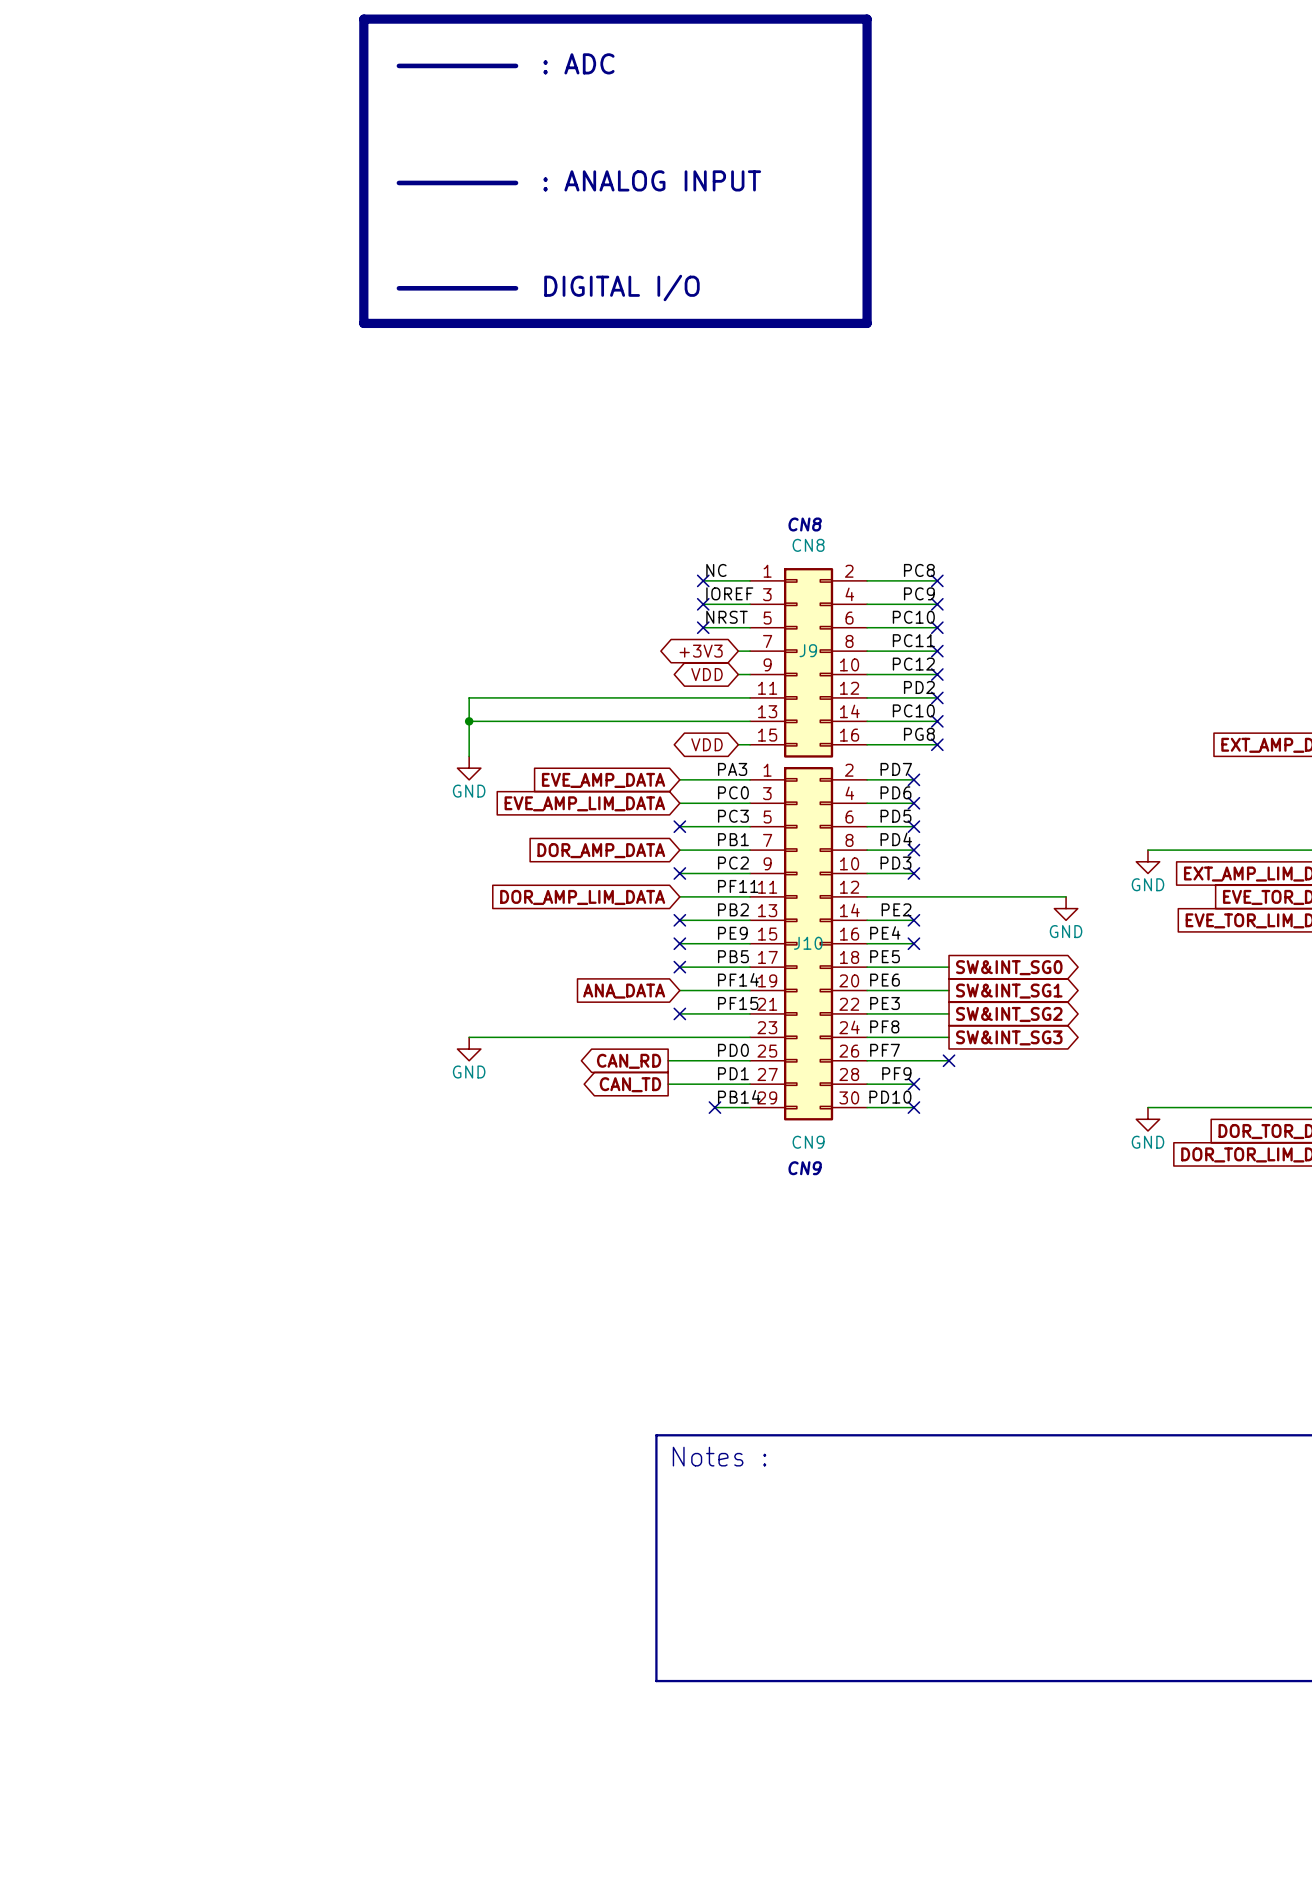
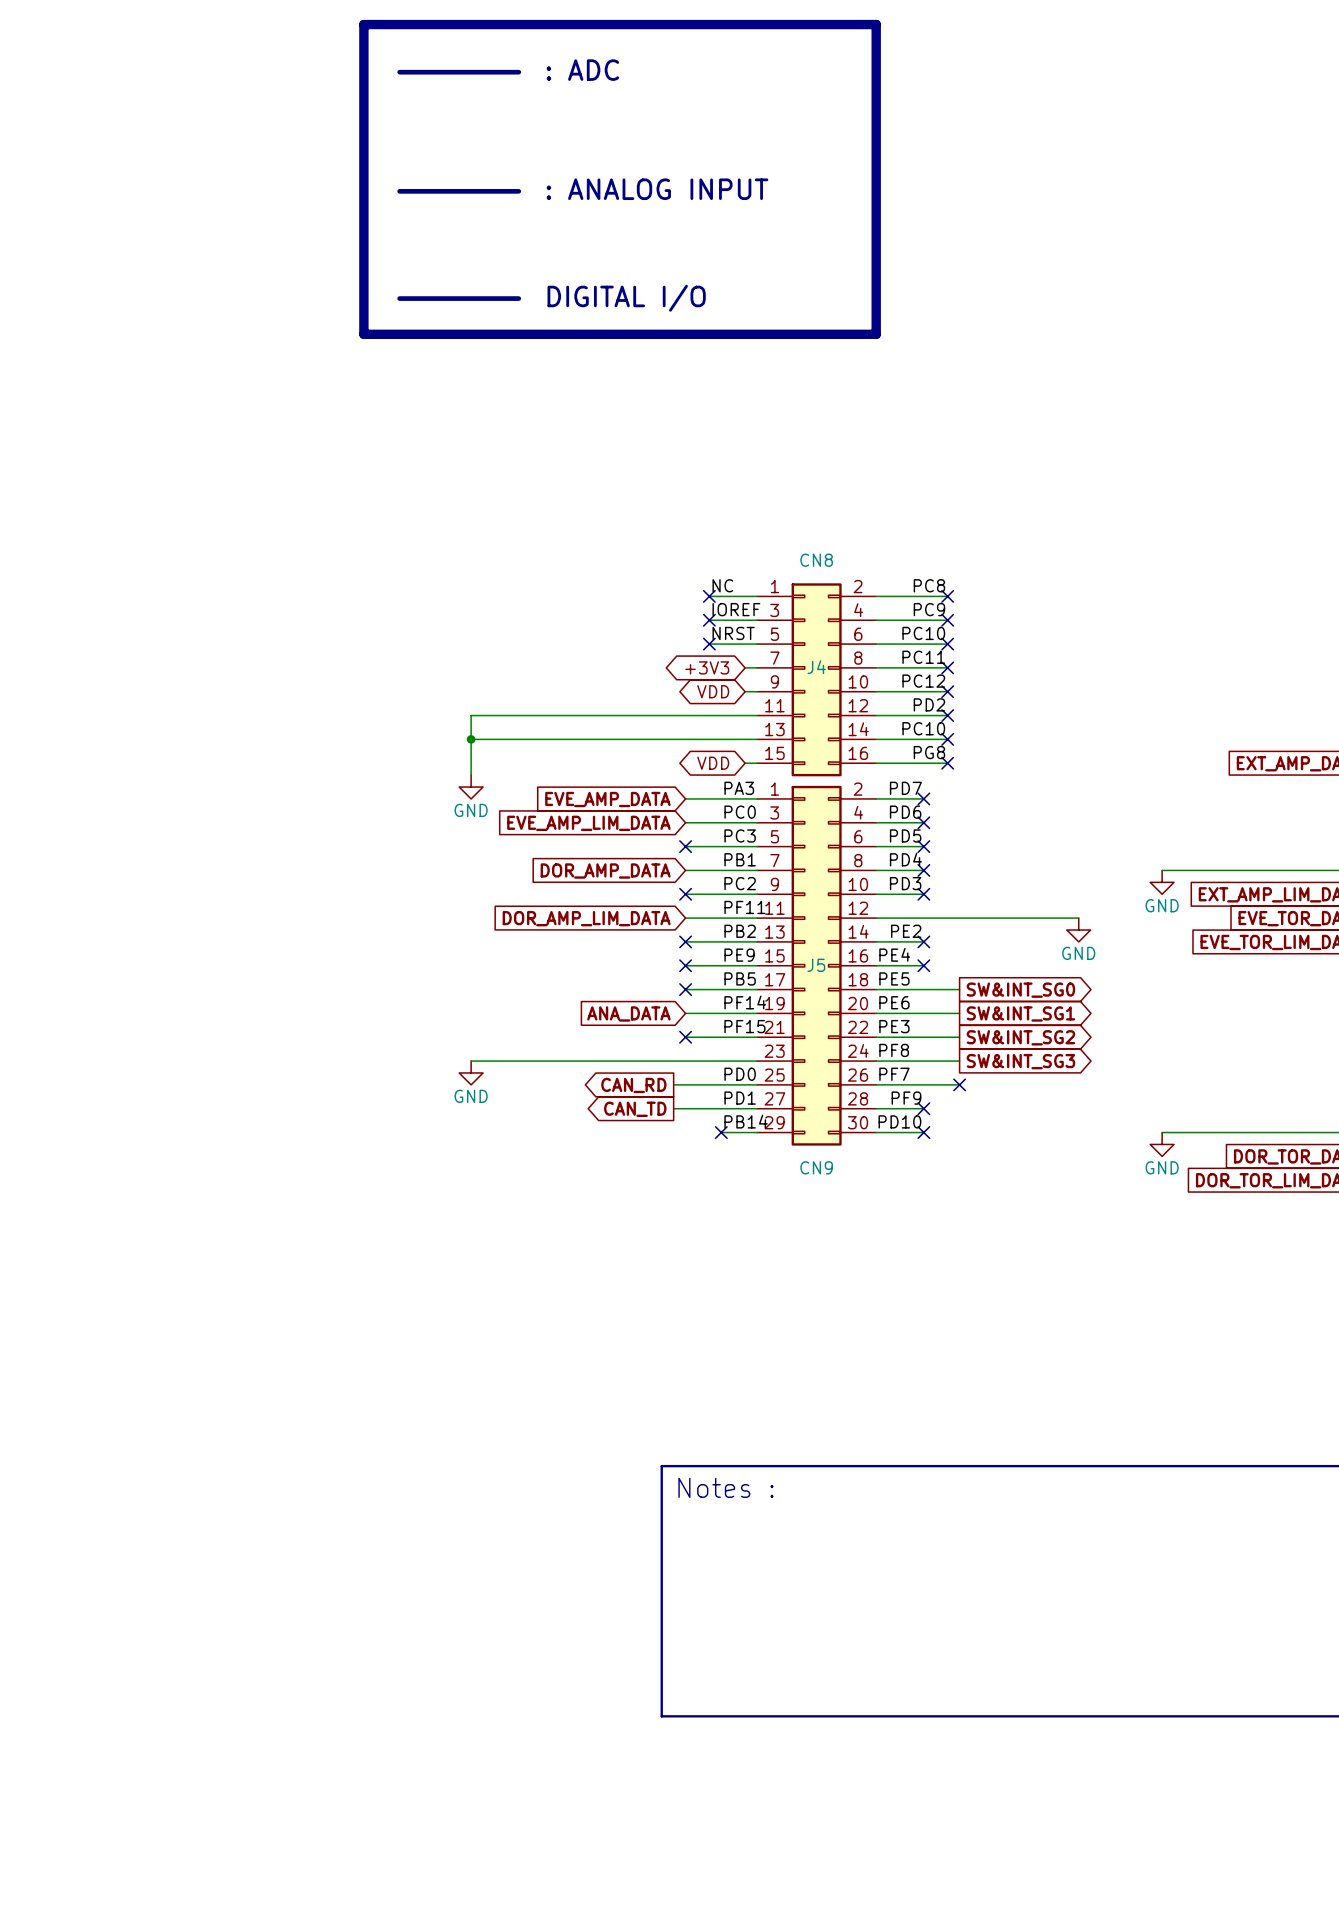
text: CN8 (805, 524) -> none
J9 name: J9 (808, 650) -> J4 (816, 667)
J10 name: J10 (808, 943) -> J5 (816, 965)
text: CN9 (805, 1168) -> none

